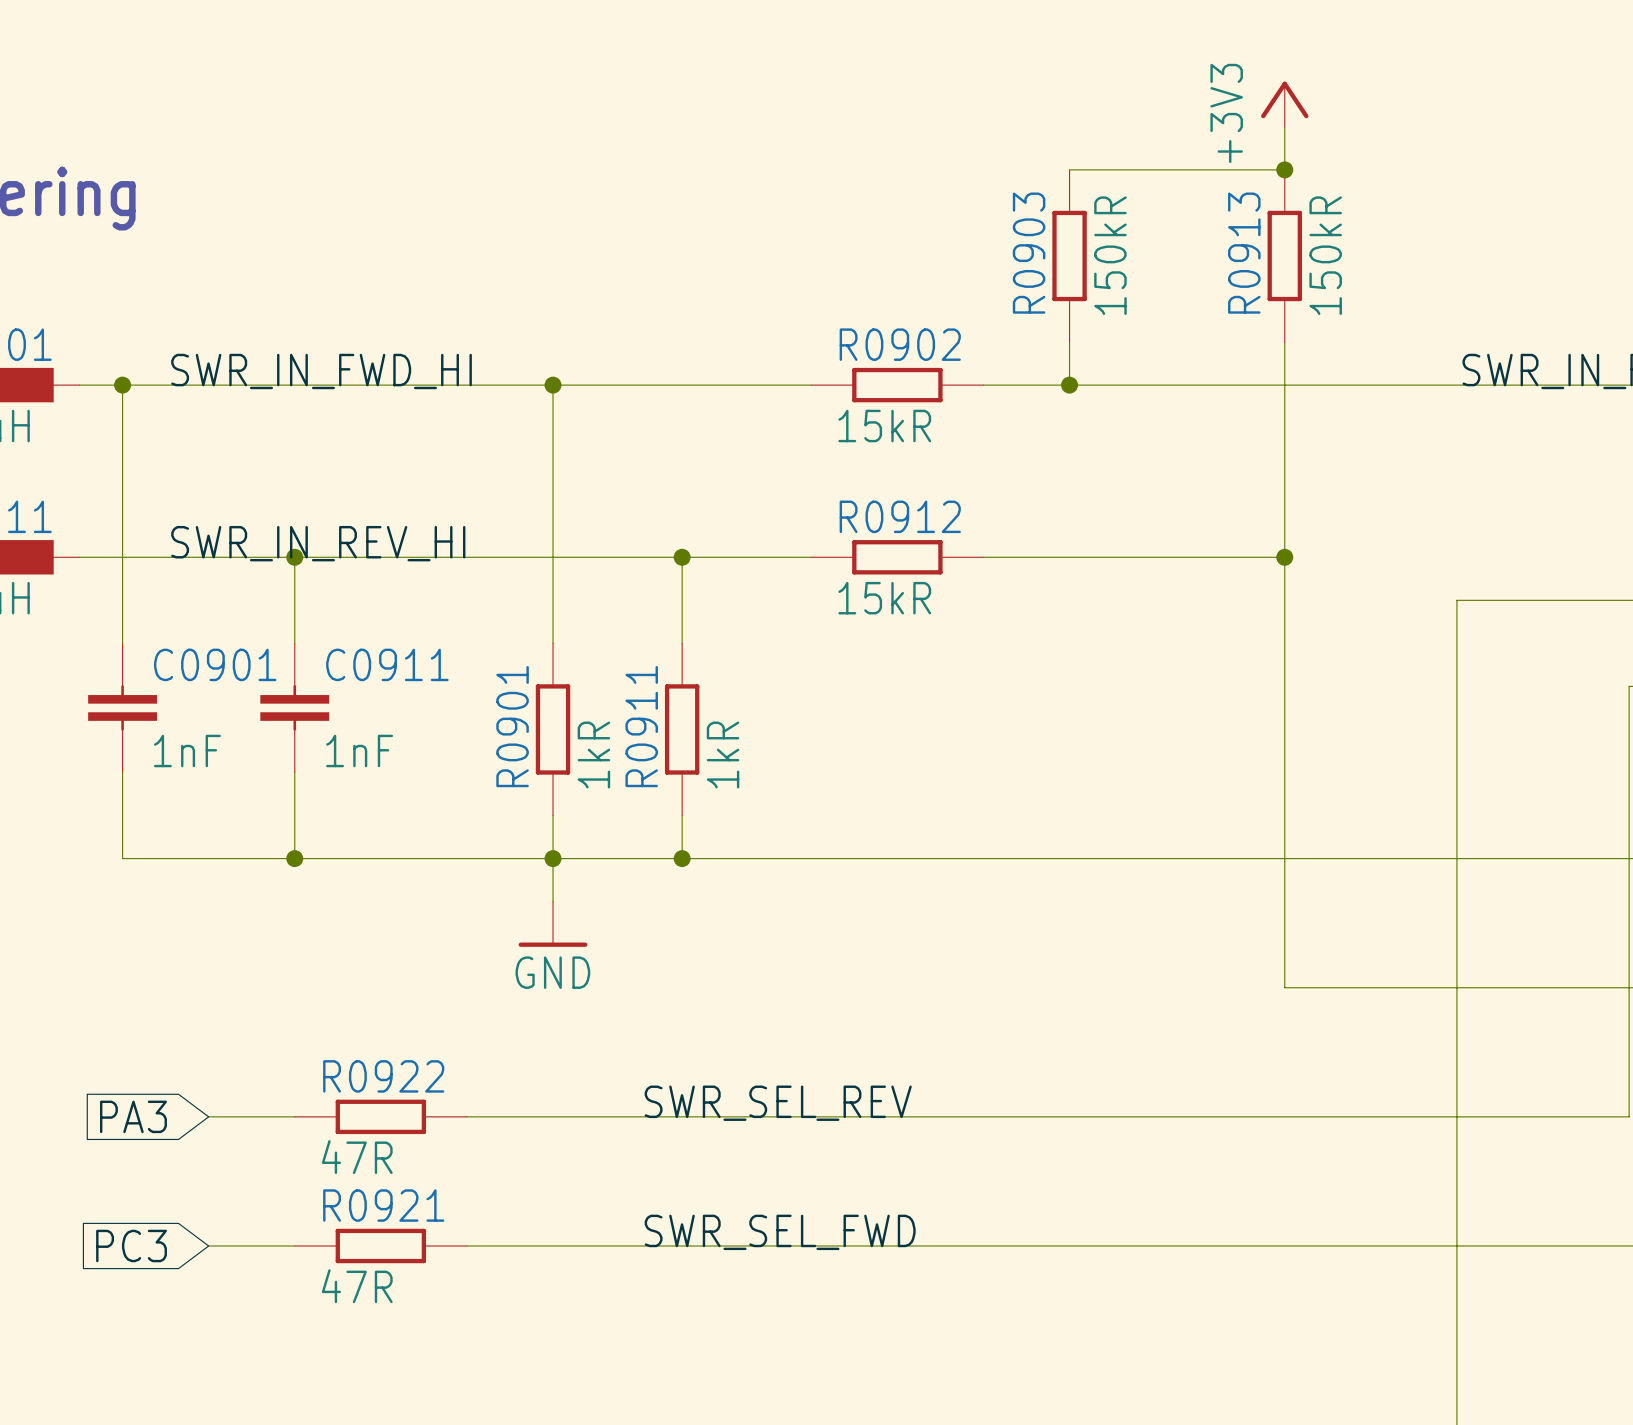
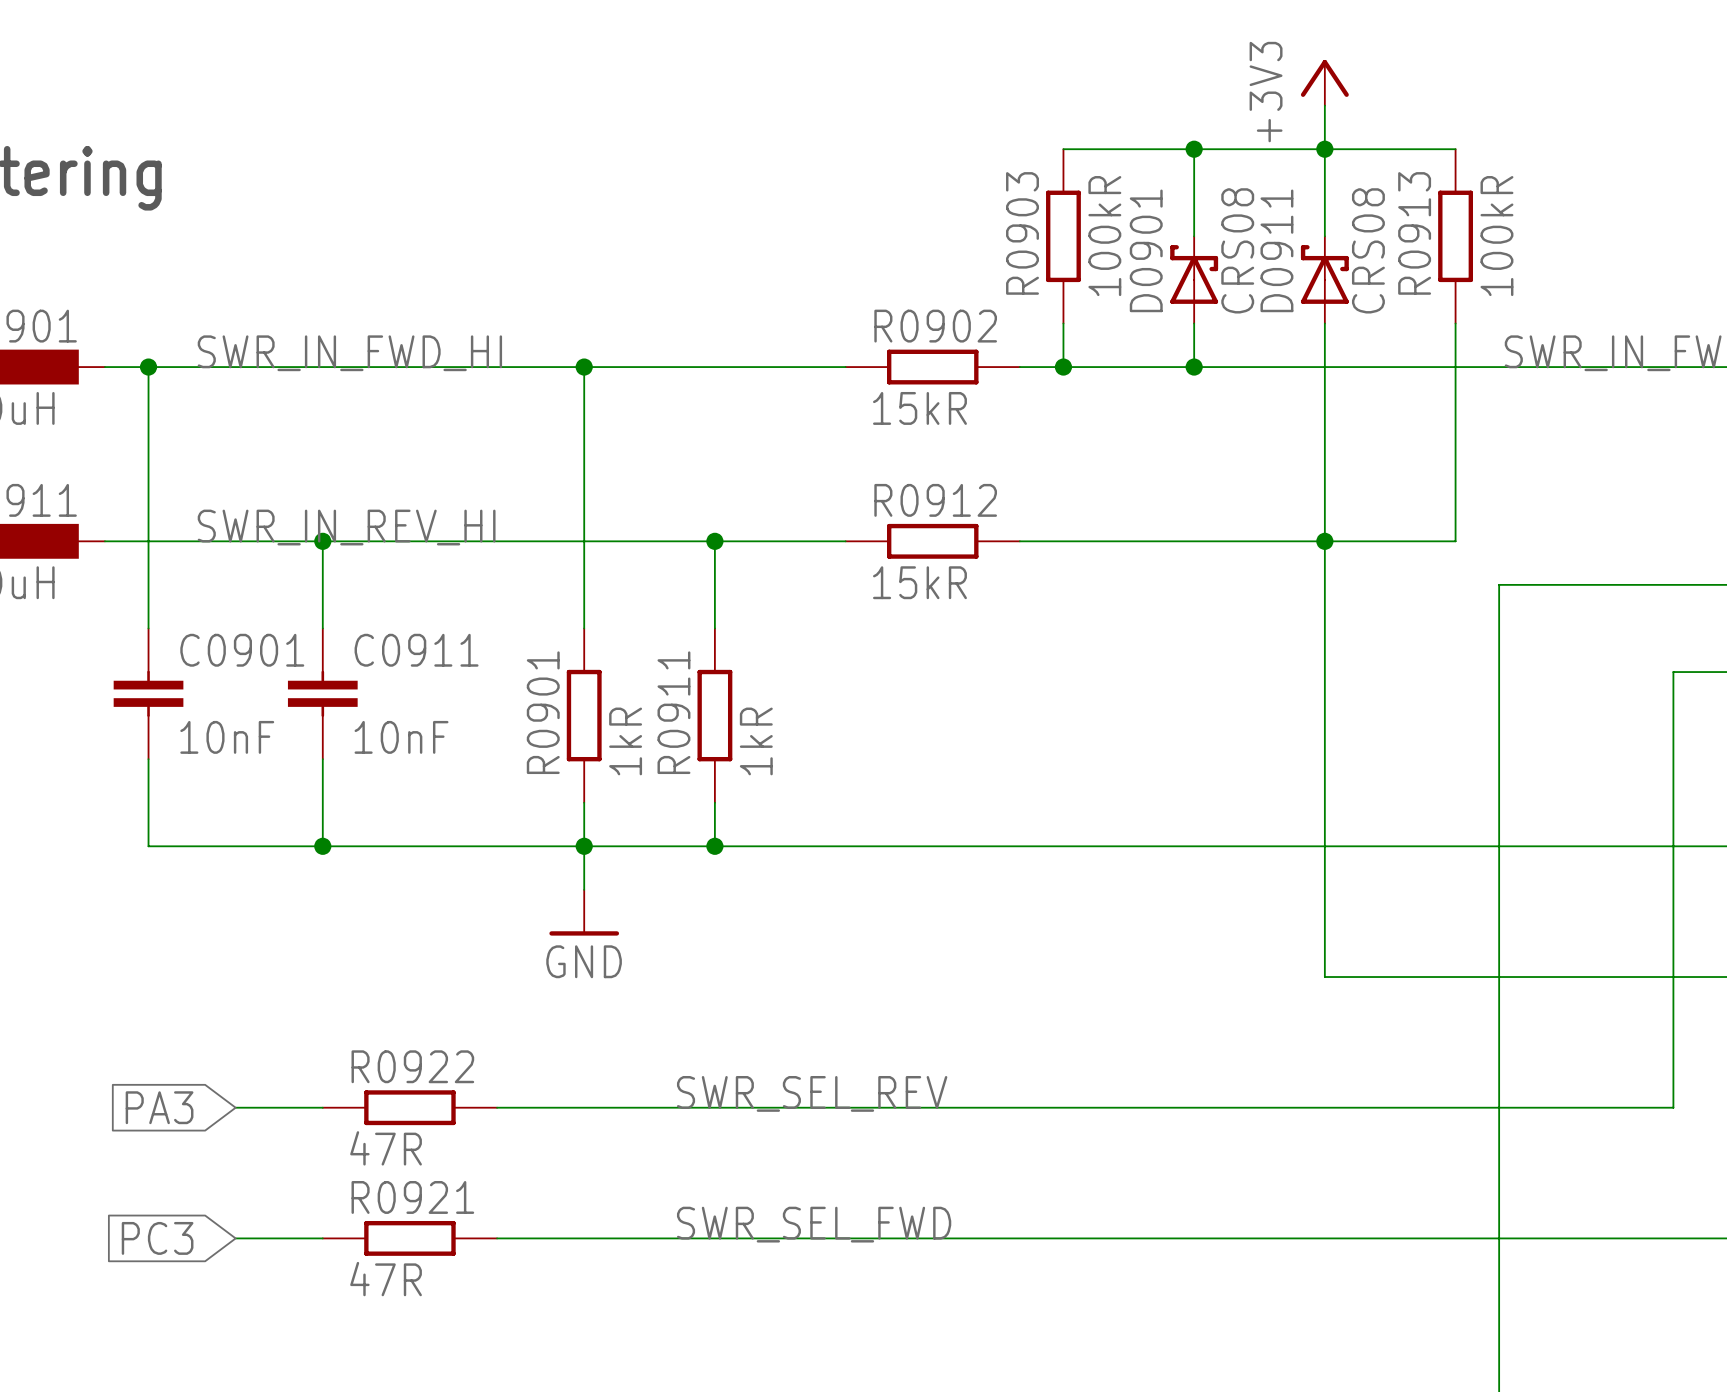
wire: none -> (1063, 149) (1107, 149)
wire: none -> (1194, 149) (1194, 236)
junction: none -> (1194, 149)
wire: none -> (1455, 149) (1324, 149) (1324, 236)
R0903 position: (1069, 255) -> (1063, 236)
R0903 value: 150kR (1110, 255) -> 100kR (1104, 236)
R0913 position: (1284, 255) -> (1455, 236)
R0913 value: 150kR (1325, 255) -> 100kR (1496, 236)
D0901: none -> CRS08 (1194, 279)
D0911: none -> CRS08 (1324, 279)
wire: (1069, 342) (1069, 385) -> (1063, 323) (1063, 367)
wire: none -> (1194, 323) (1194, 367)
wire: none -> (1455, 323) (1455, 541) (1324, 541)
junction: none -> (1063, 367)
junction: (1069, 385) -> none
junction: none -> (1194, 367)
C0901 value: 1nF (187, 750) -> 10nF (227, 737)
C0911 value: 1nF (359, 750) -> 10nF (401, 737)

